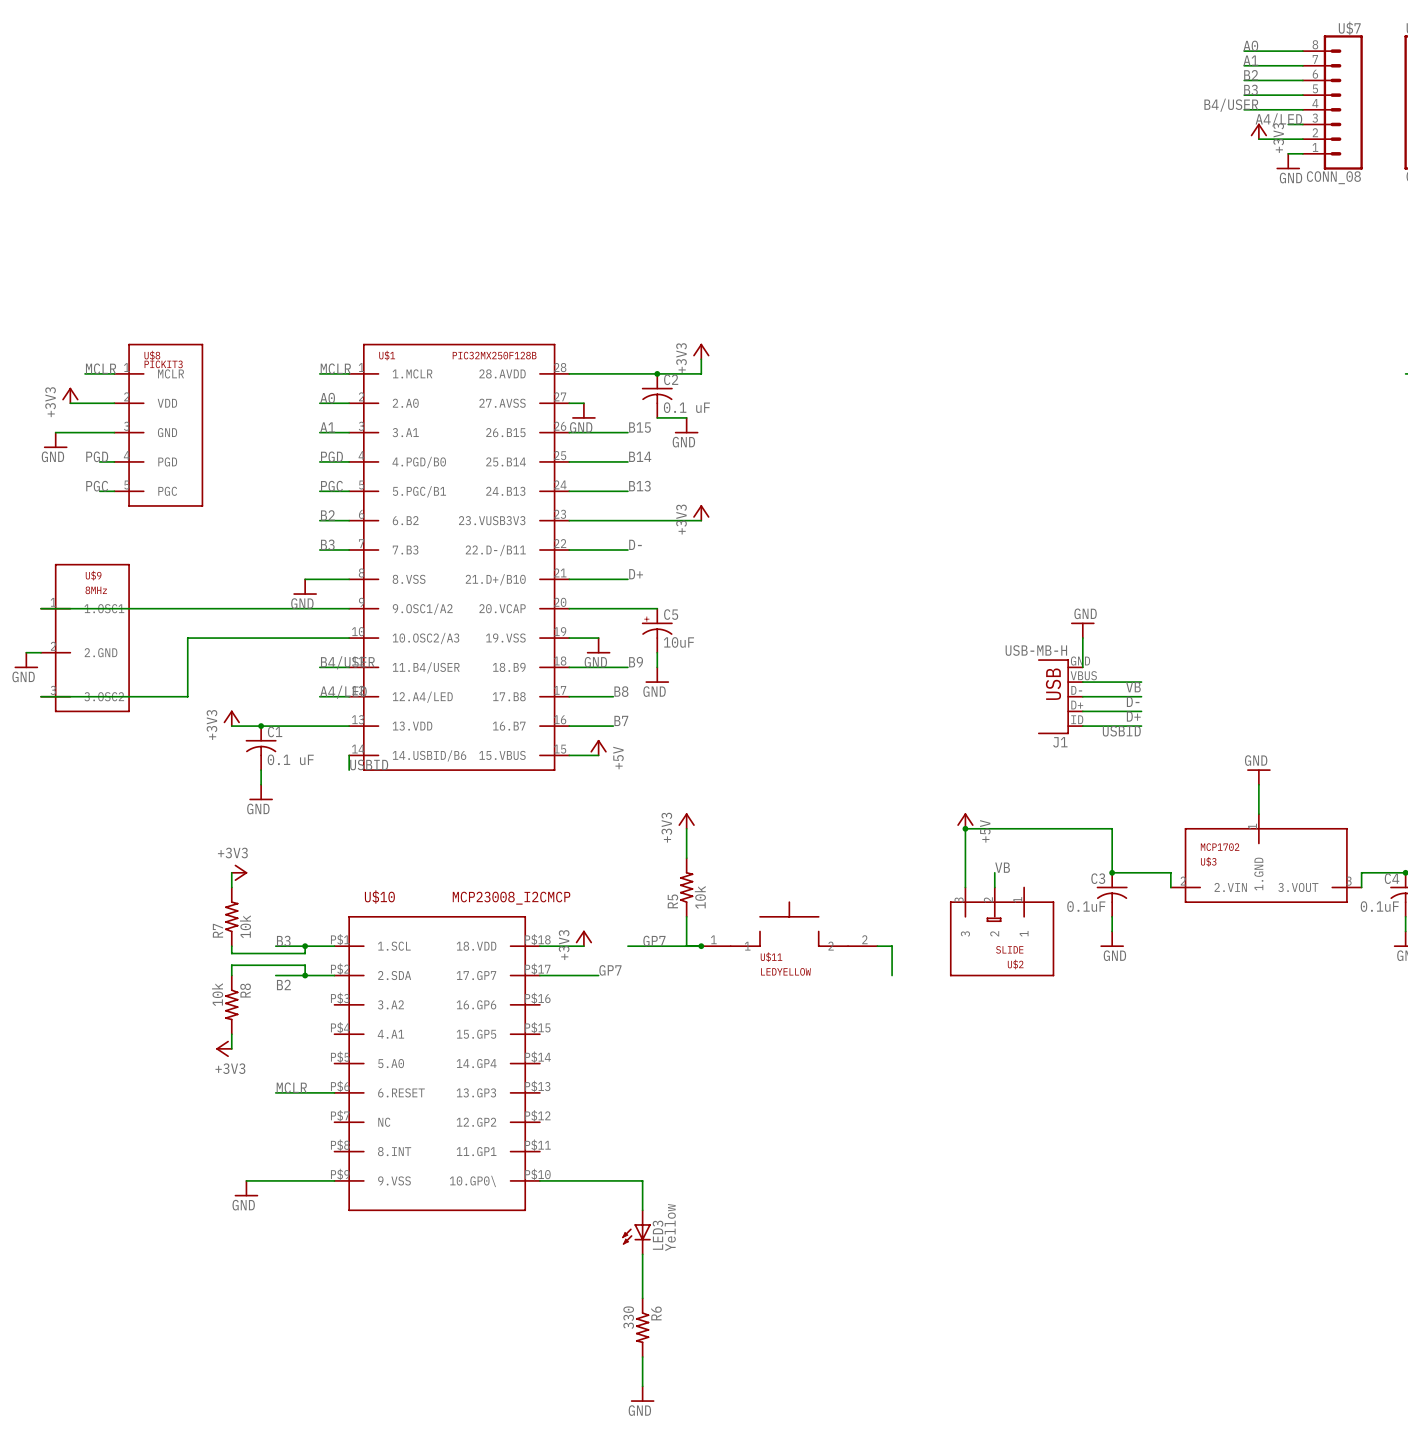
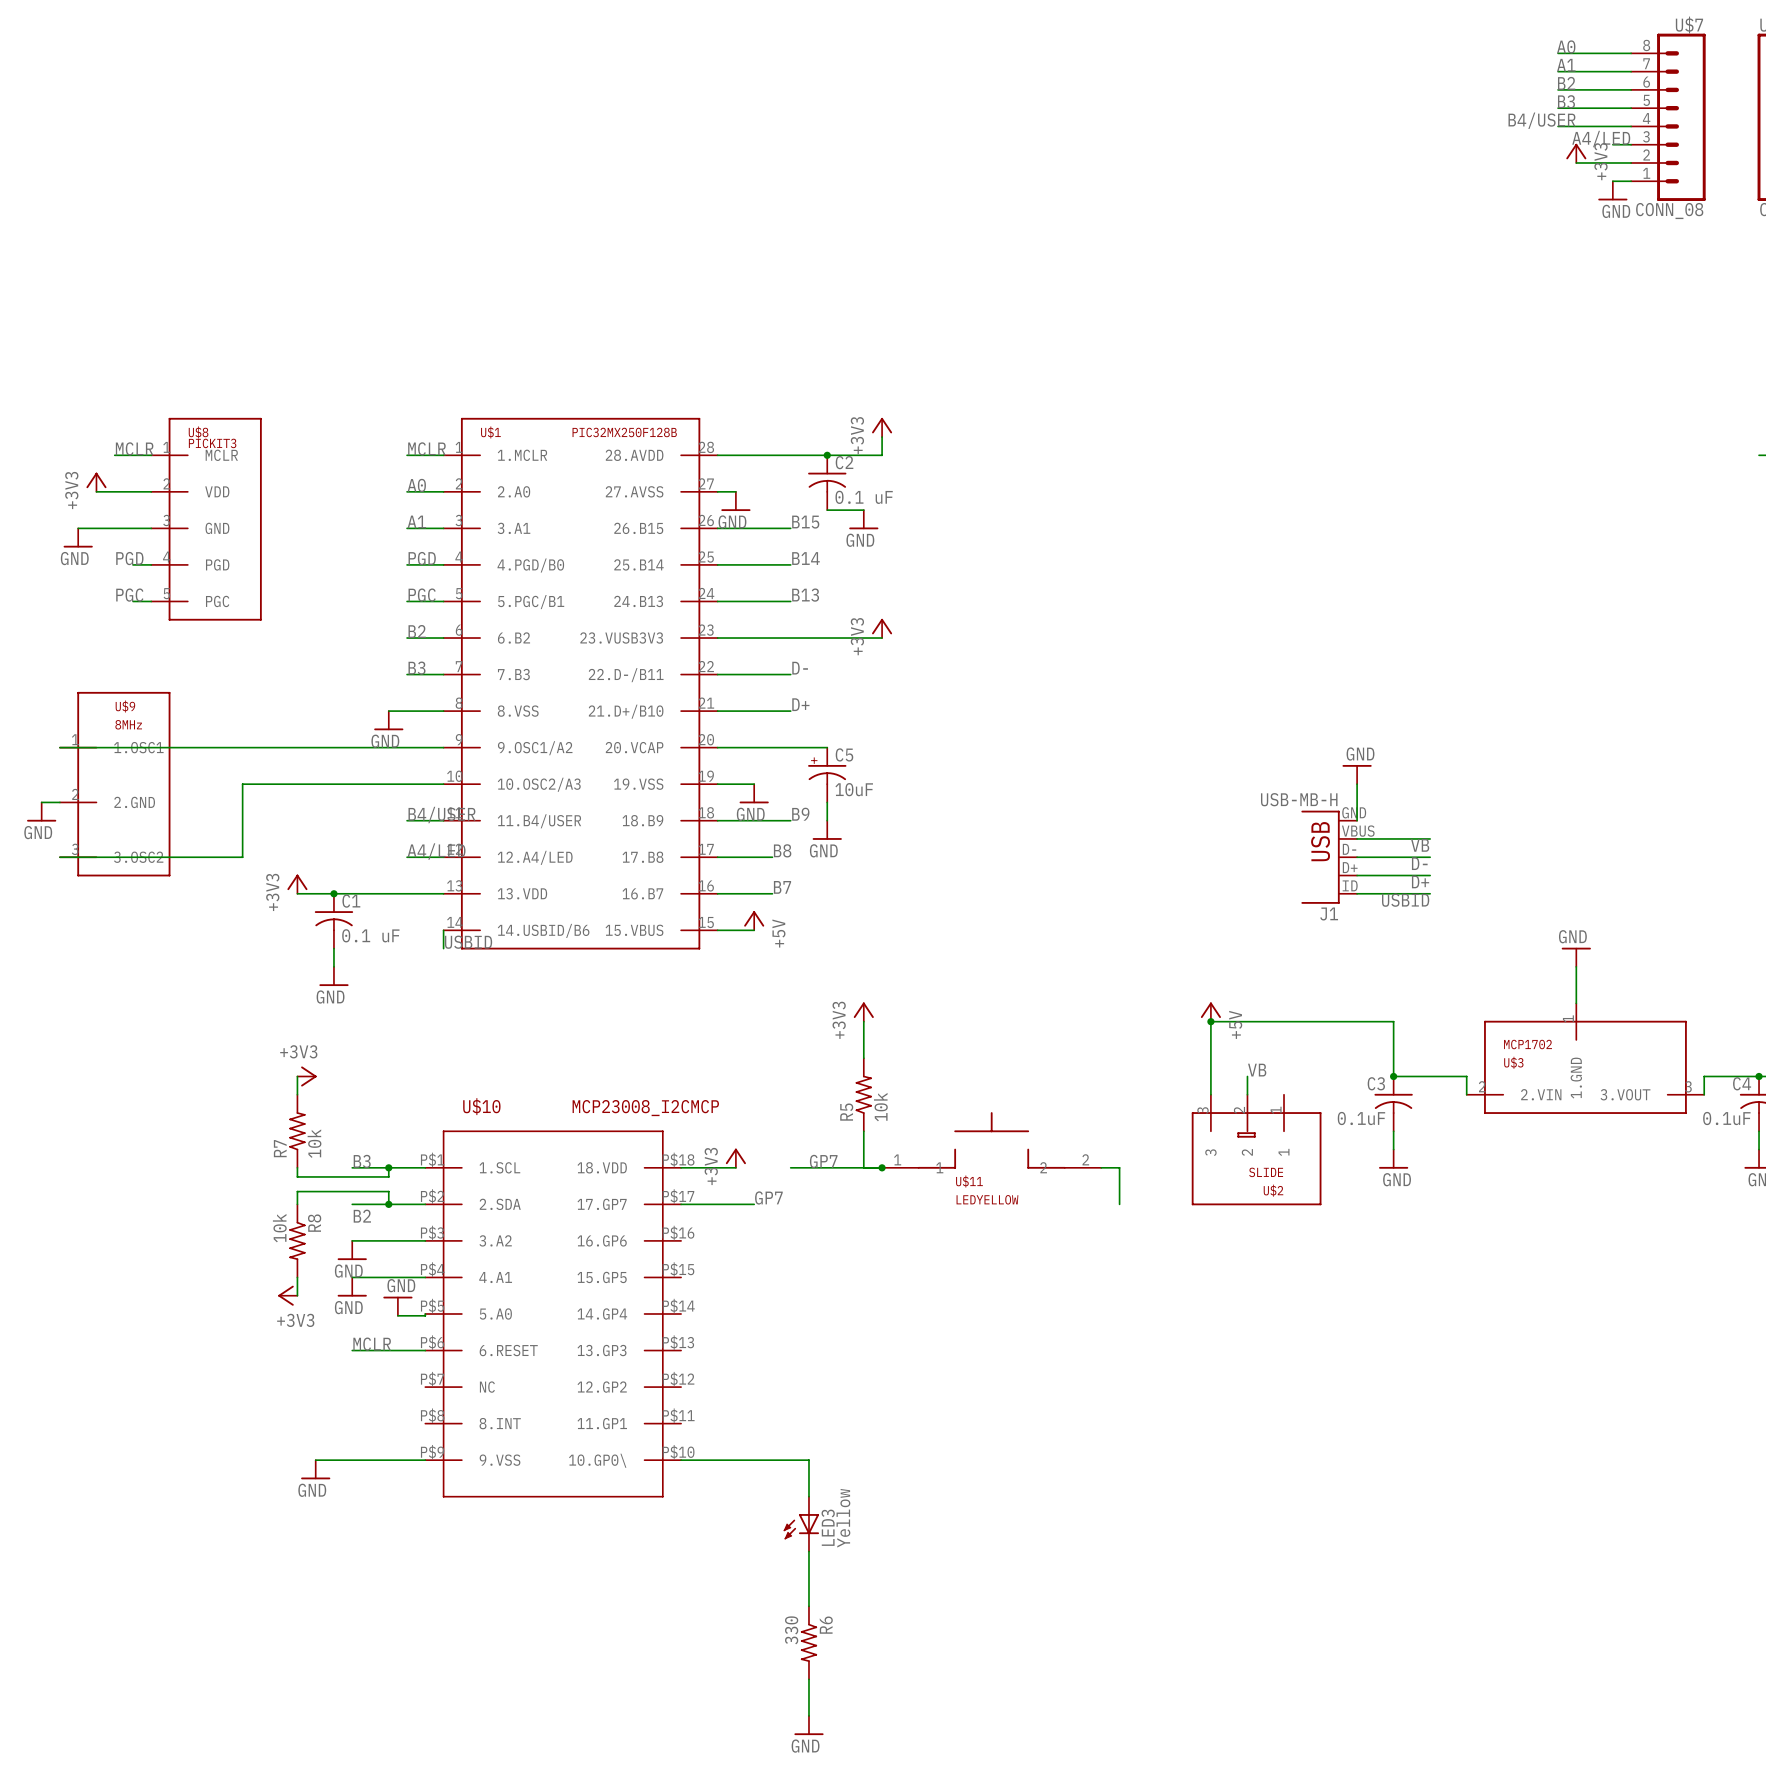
wire: none -> (352, 1240) (425, 1240)
power symbol: none -> GND (352, 1250)
wire: none -> (352, 1277) (425, 1277)
power symbol: none -> GND (352, 1287)
power symbol: none -> GND (397, 1306)
wire: none -> (425, 1313) (425, 1315) (397, 1315)

